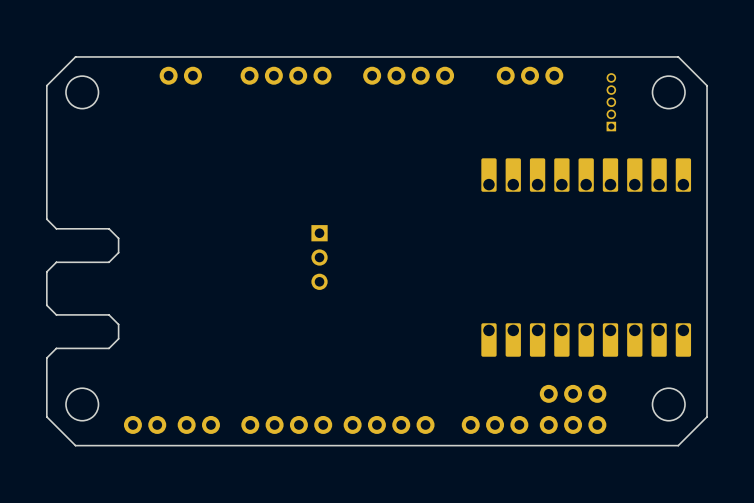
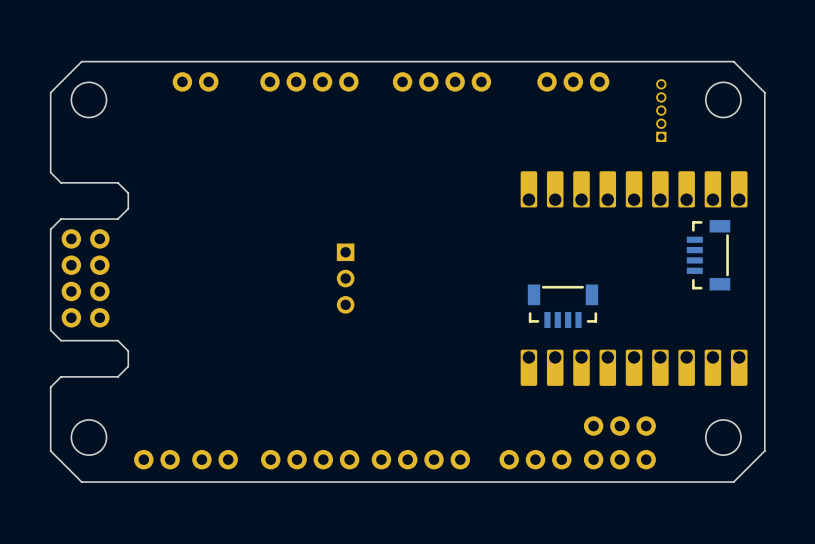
board edge: (46, 159) (46, 212) -> (50, 172) (61, 182) (117, 182) (128, 193) (128, 208) (117, 219) (61, 219) (50, 229)
board edge: (46, 219) (56, 228) (109, 228) (118, 238) (118, 252) (109, 262) (56, 262) (46, 271) -> (50, 237) (50, 294)
part: none -> (708, 255)
part: none -> (71, 278)
part: none -> (99, 278)
part: none -> (562, 306)

